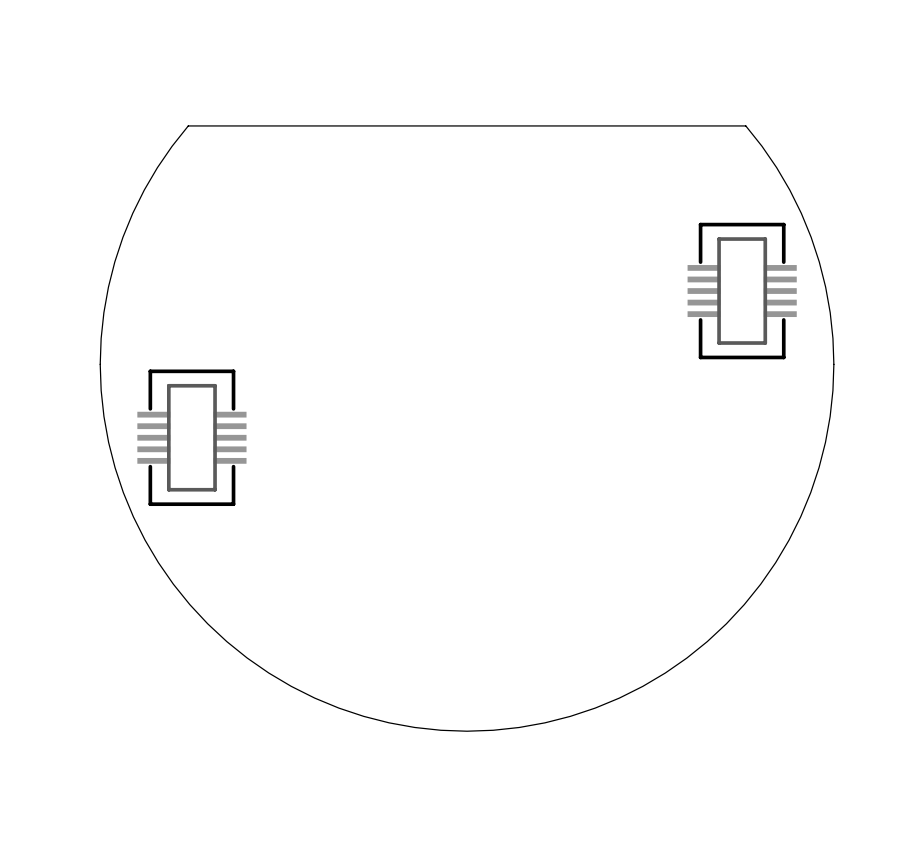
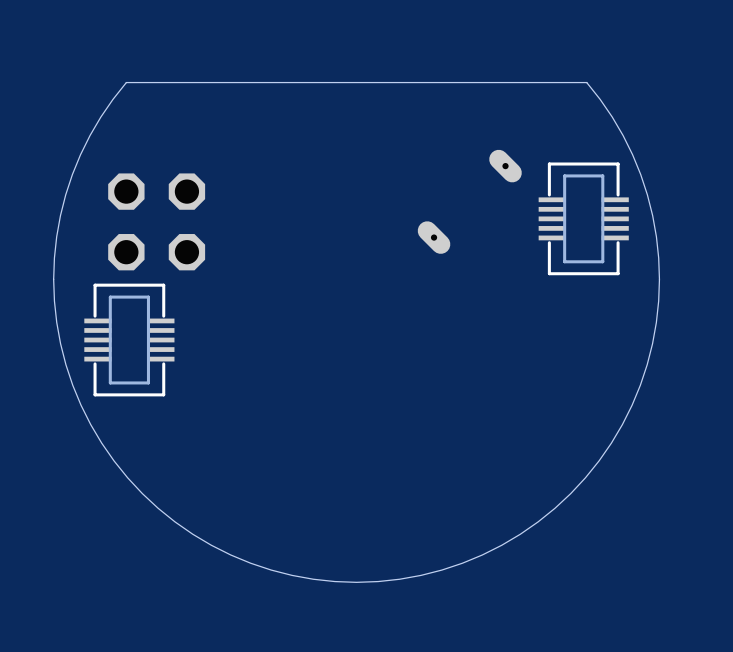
part: none -> (469, 201)
part: none -> (156, 221)

